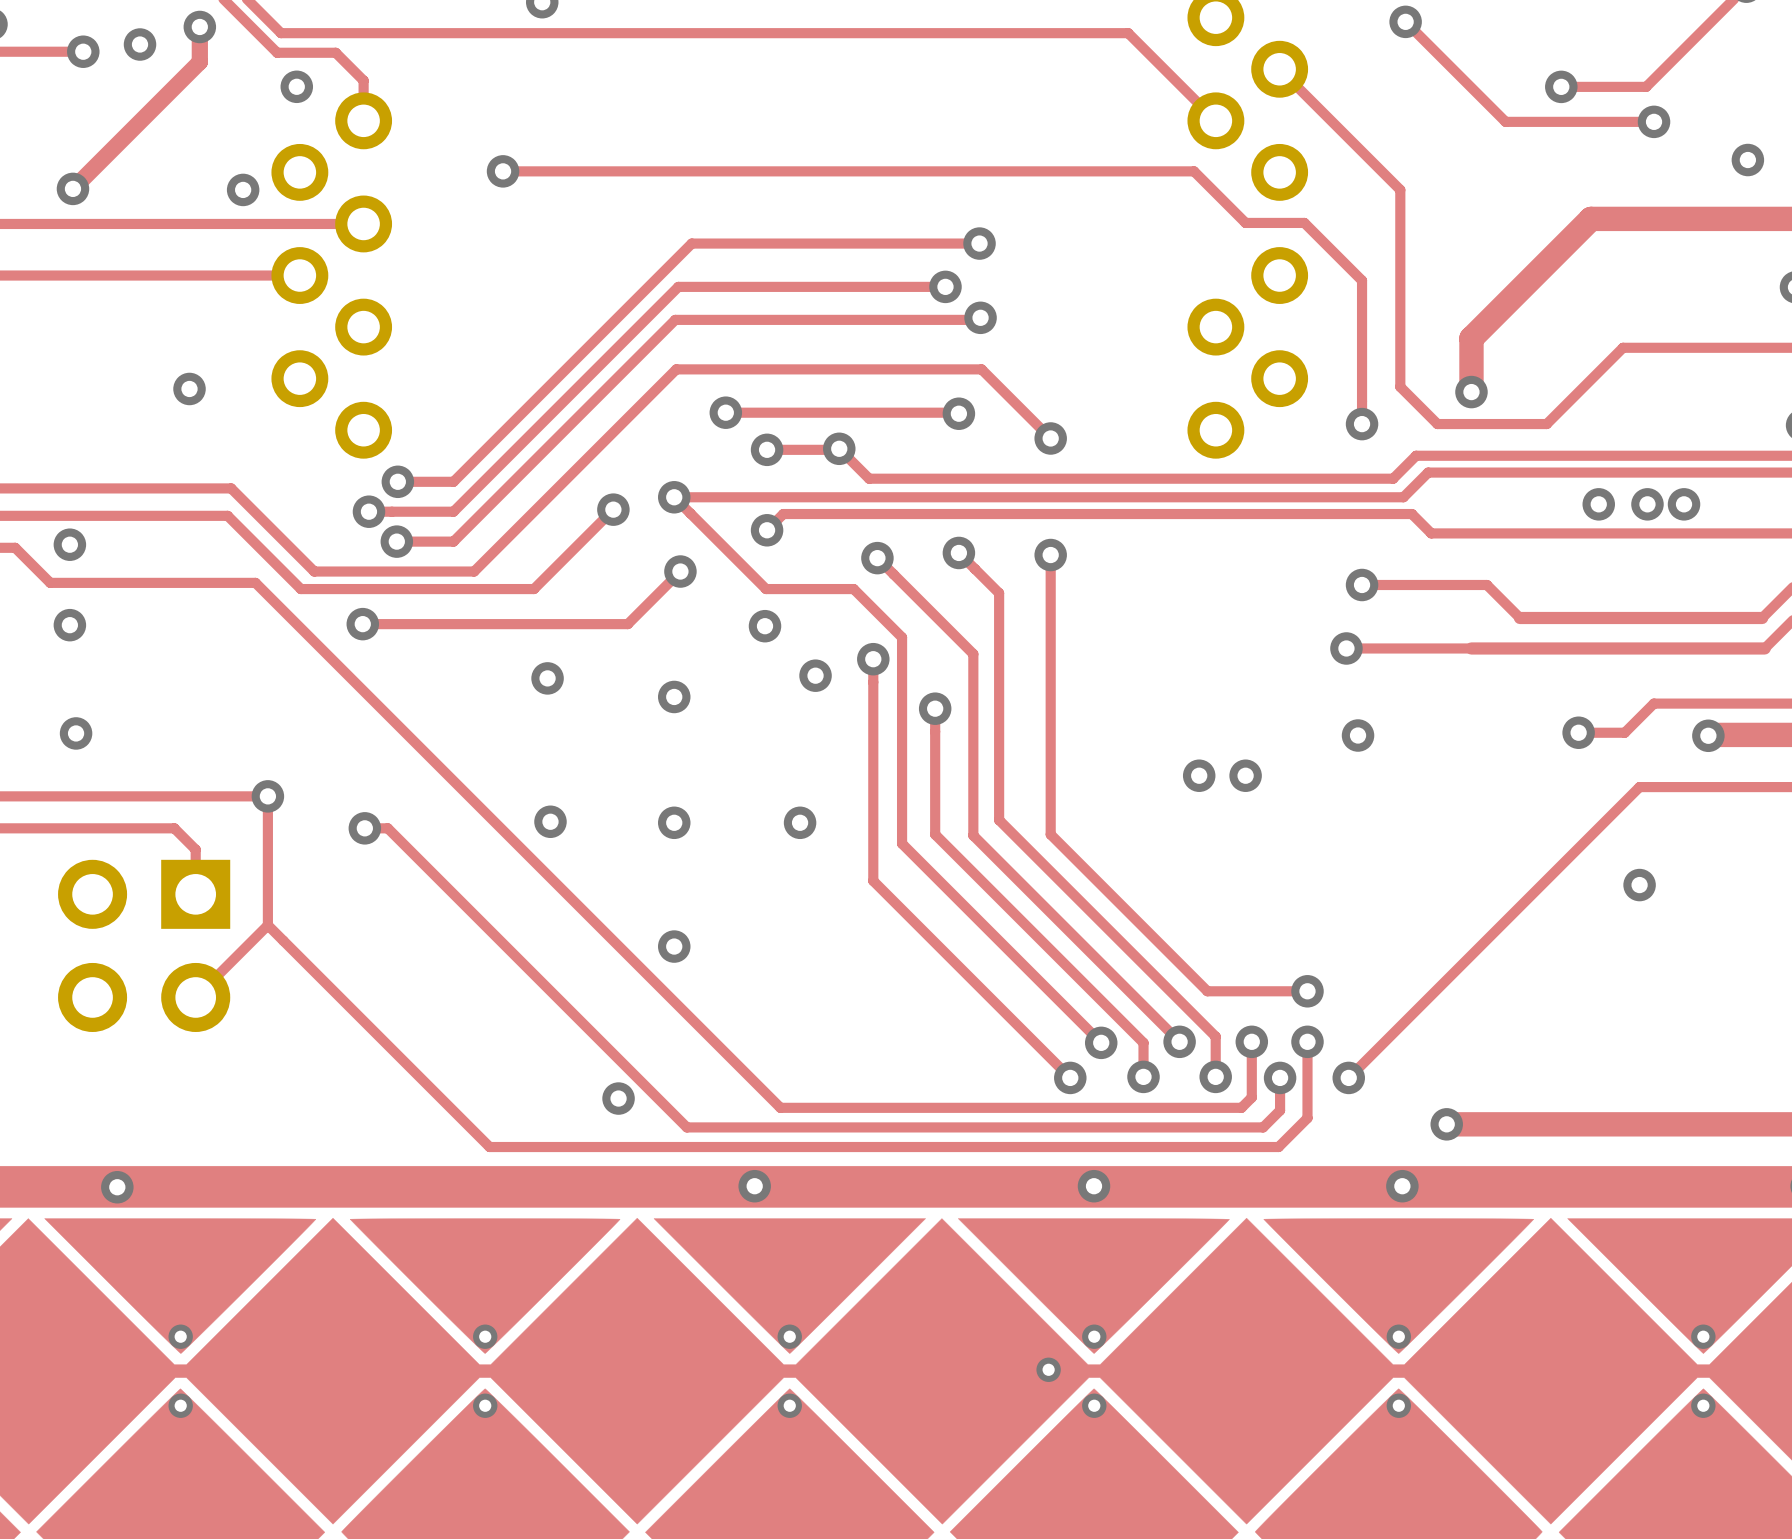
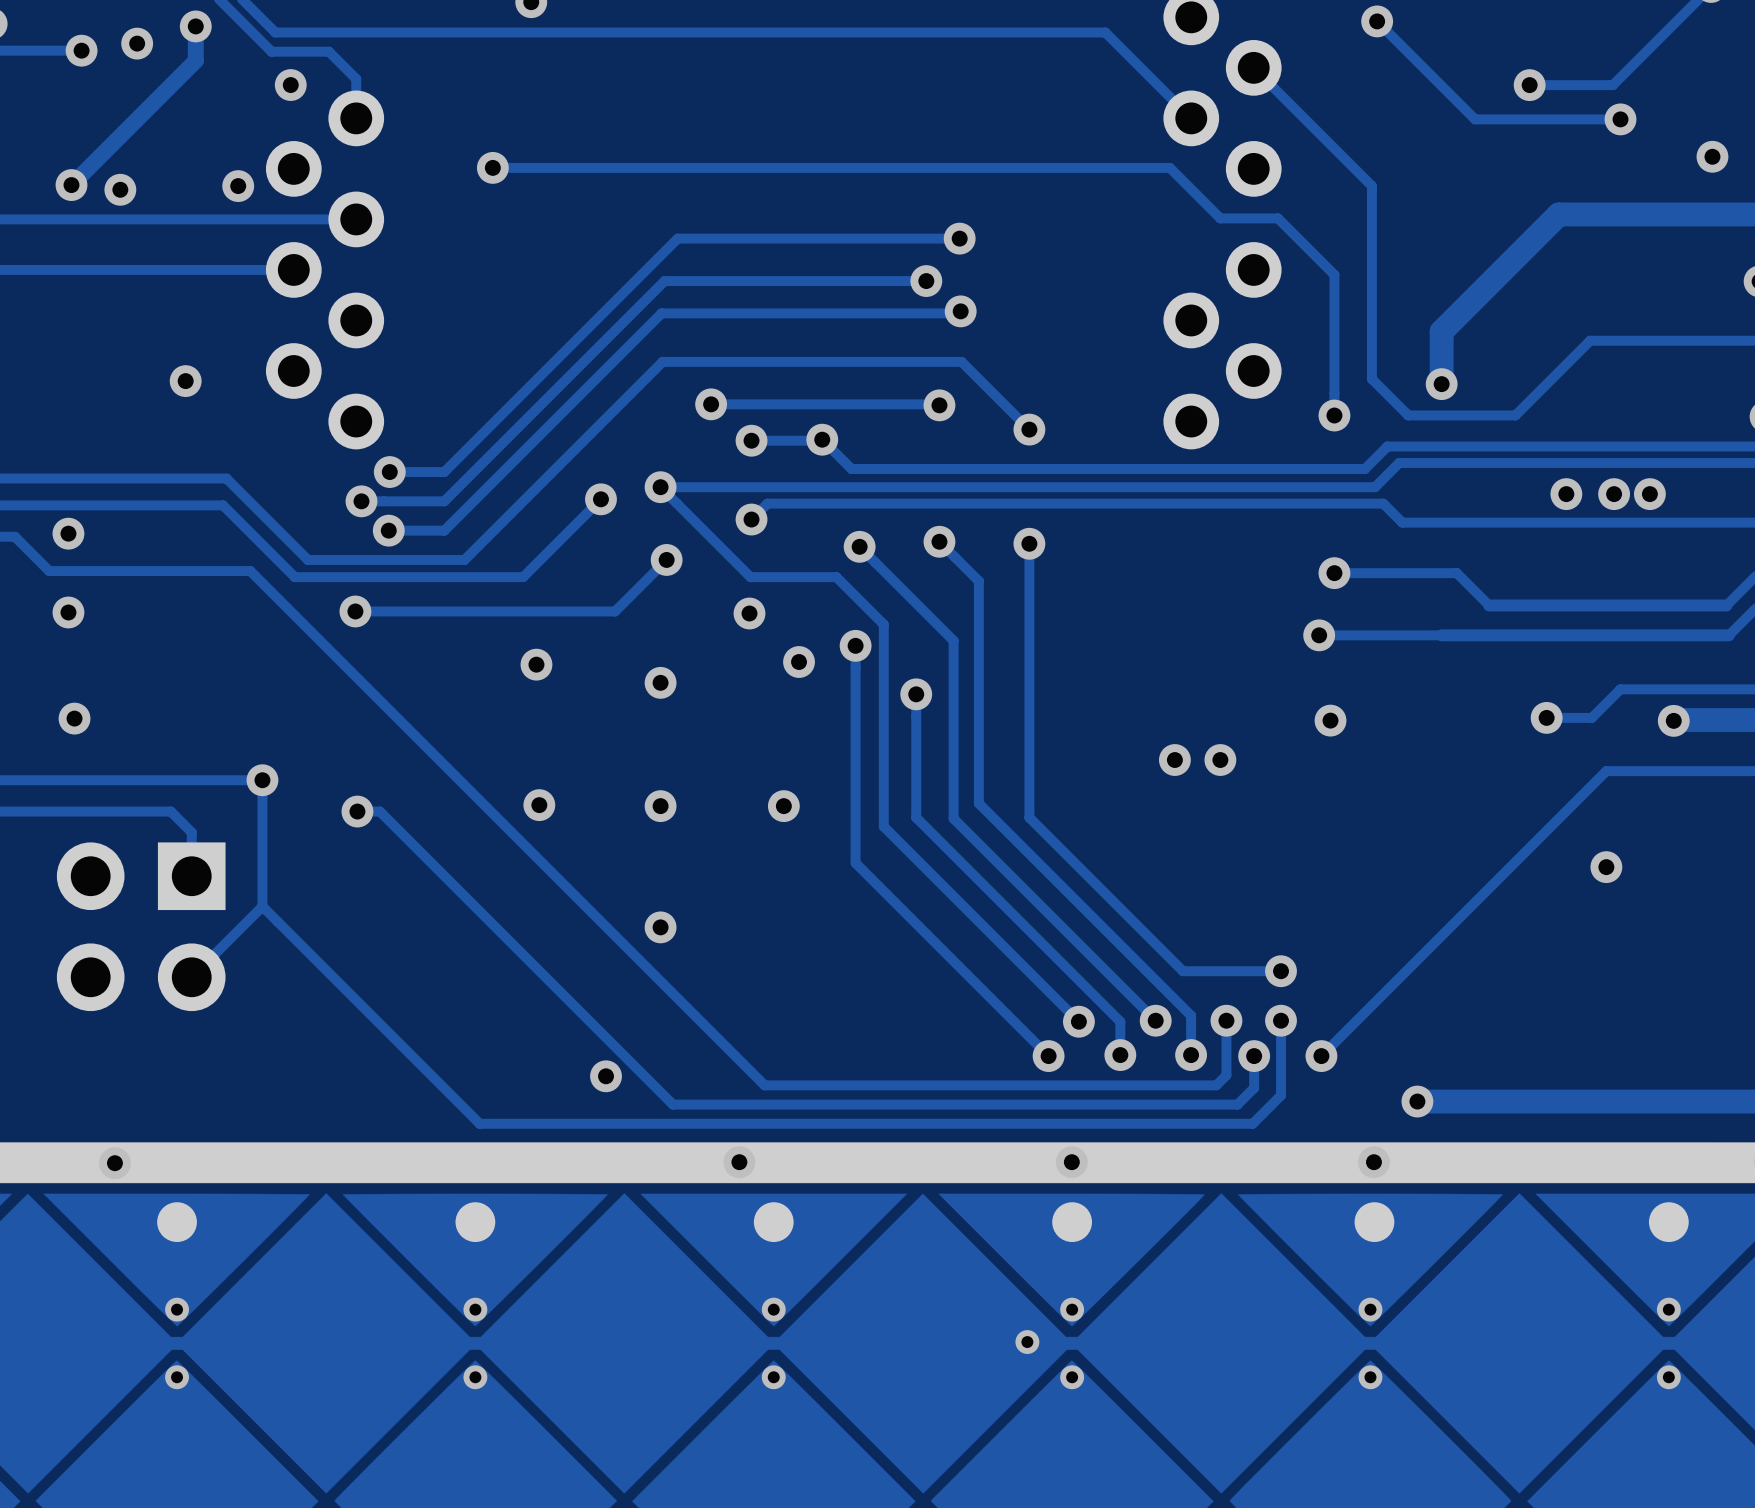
via: none -> (120, 189)

